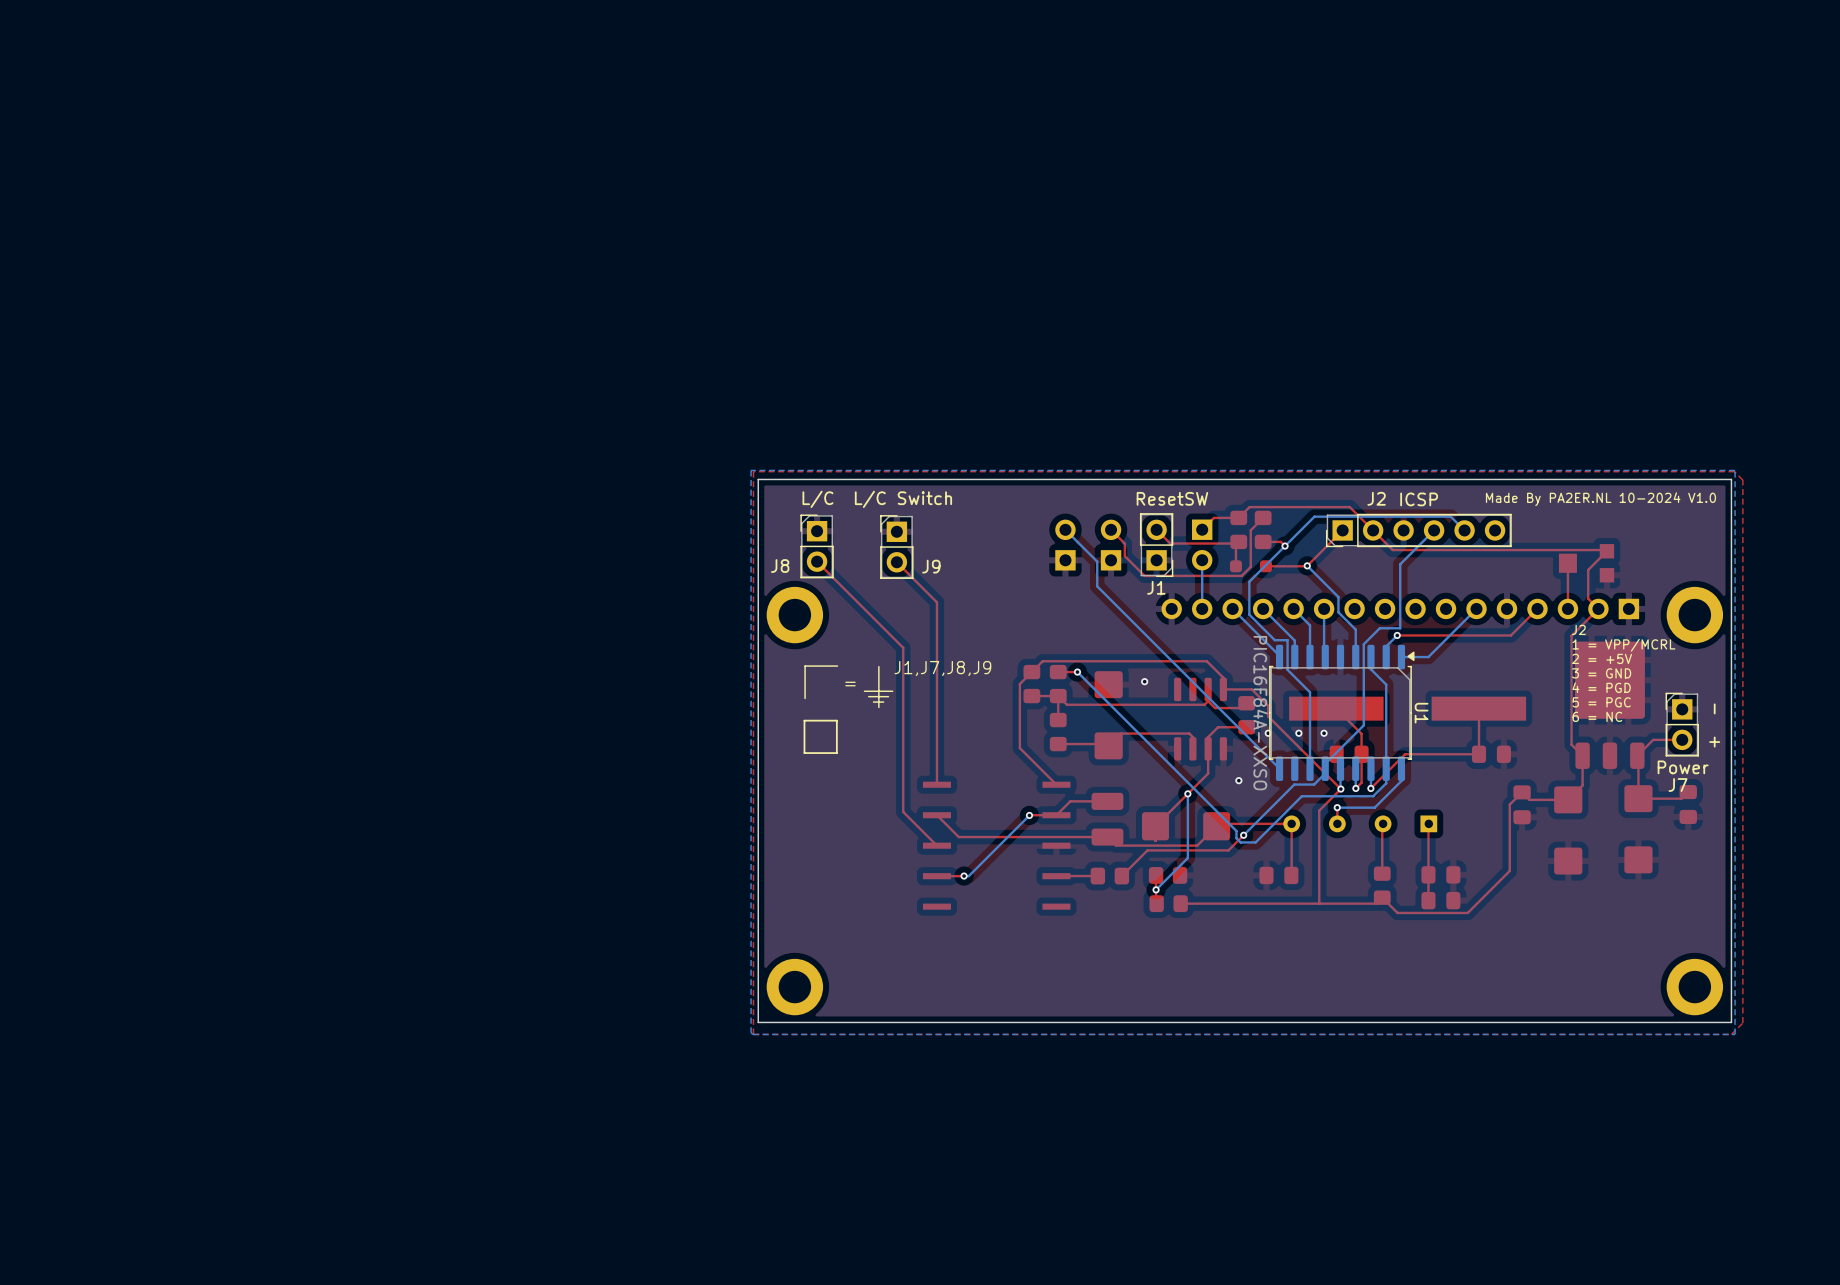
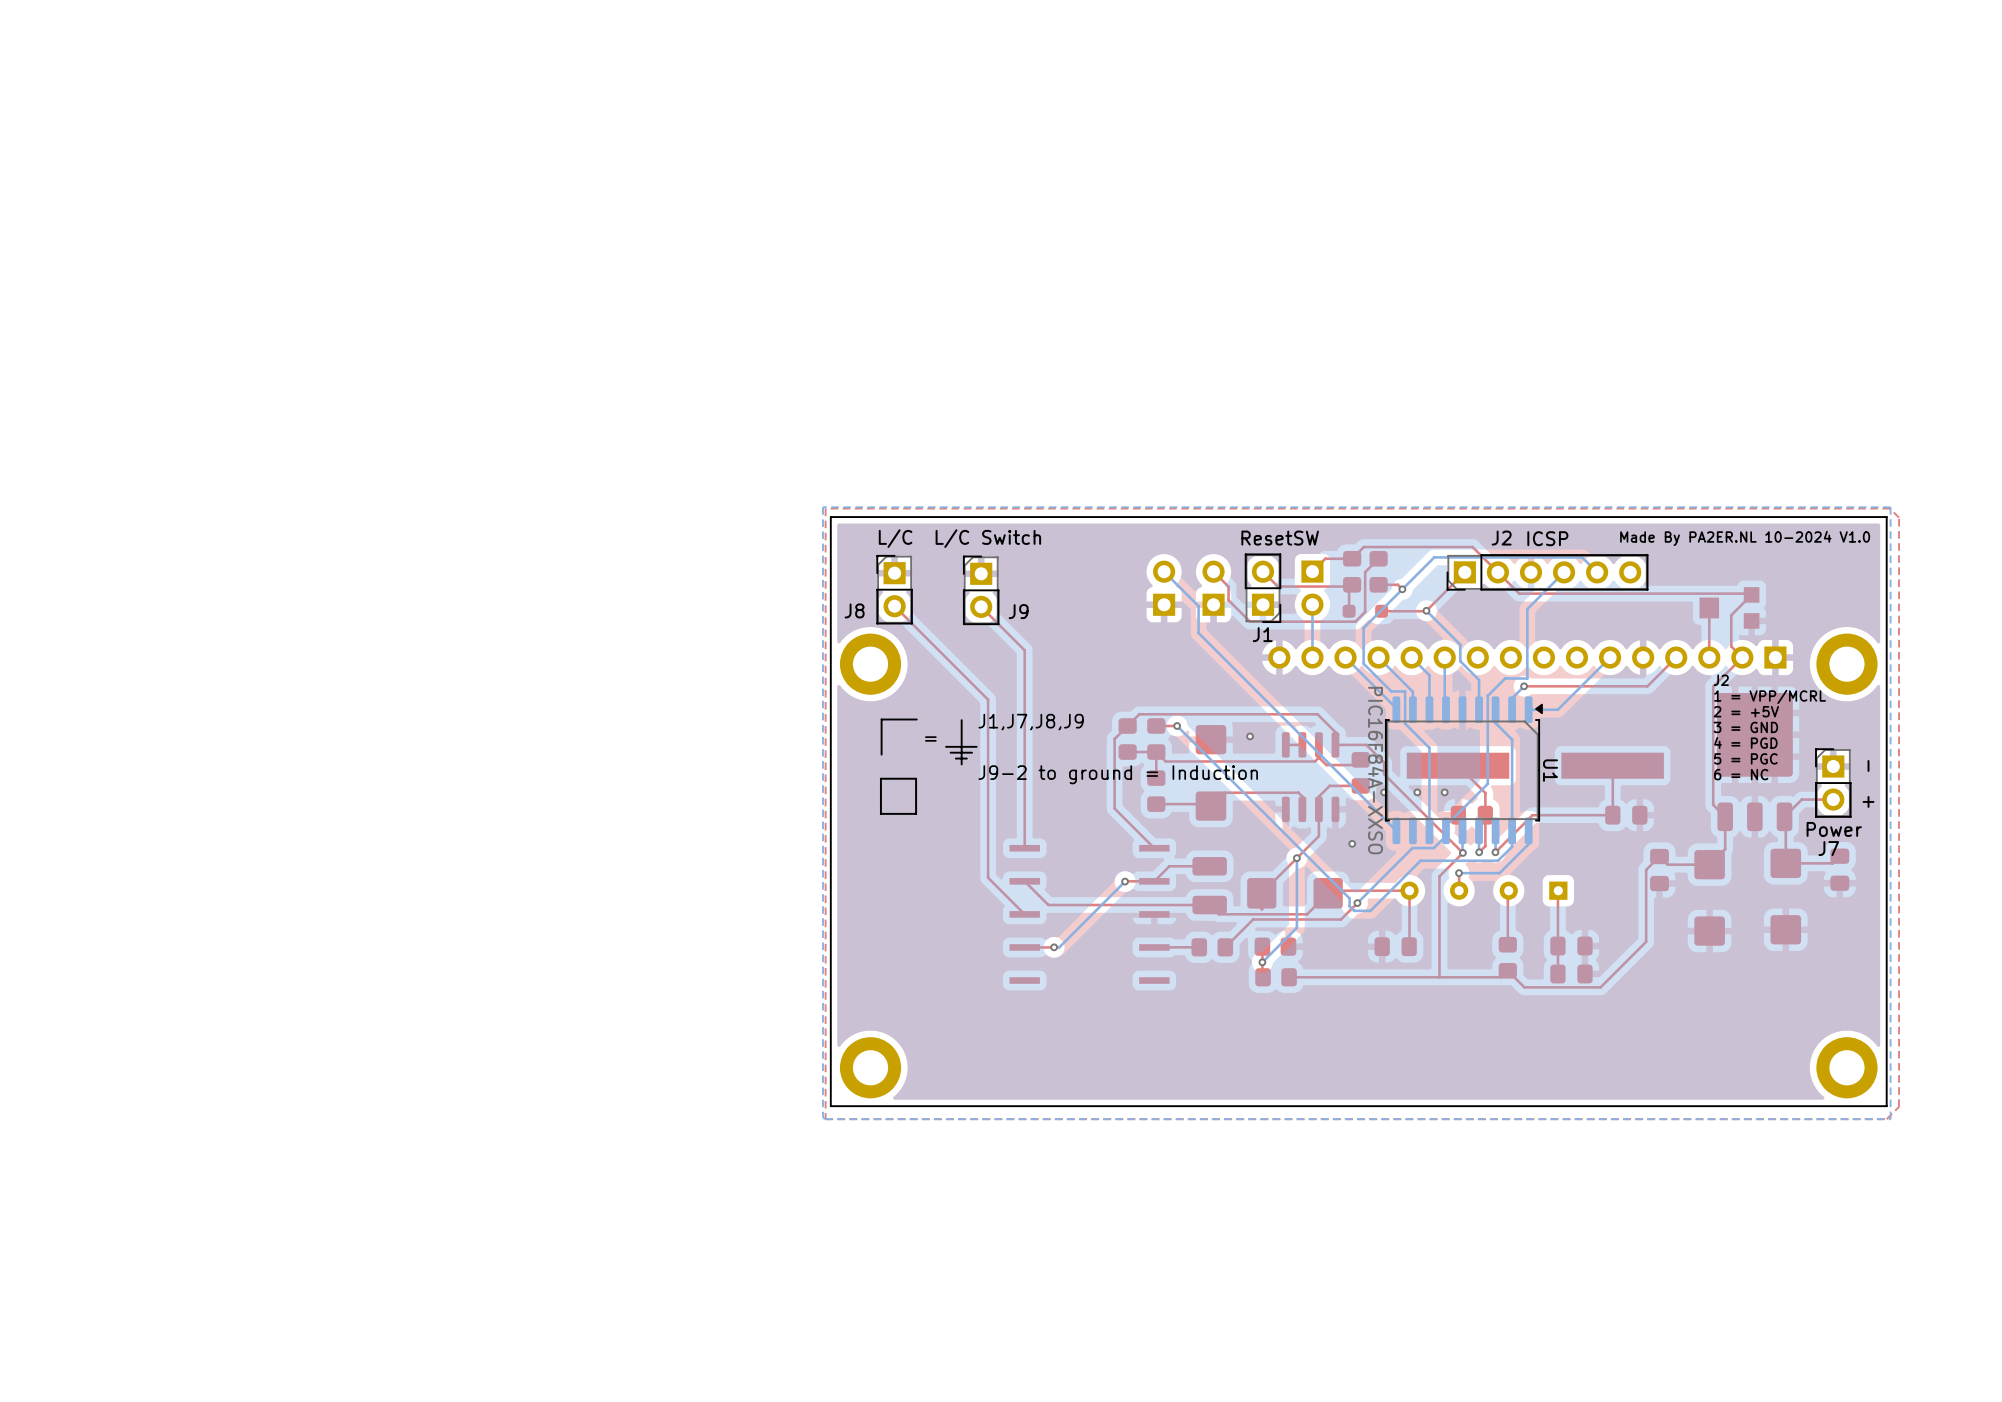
top track: none -> (1302, 744) (1285, 744)
text: none -> J9-2 to ground = Induction (1118, 774)

